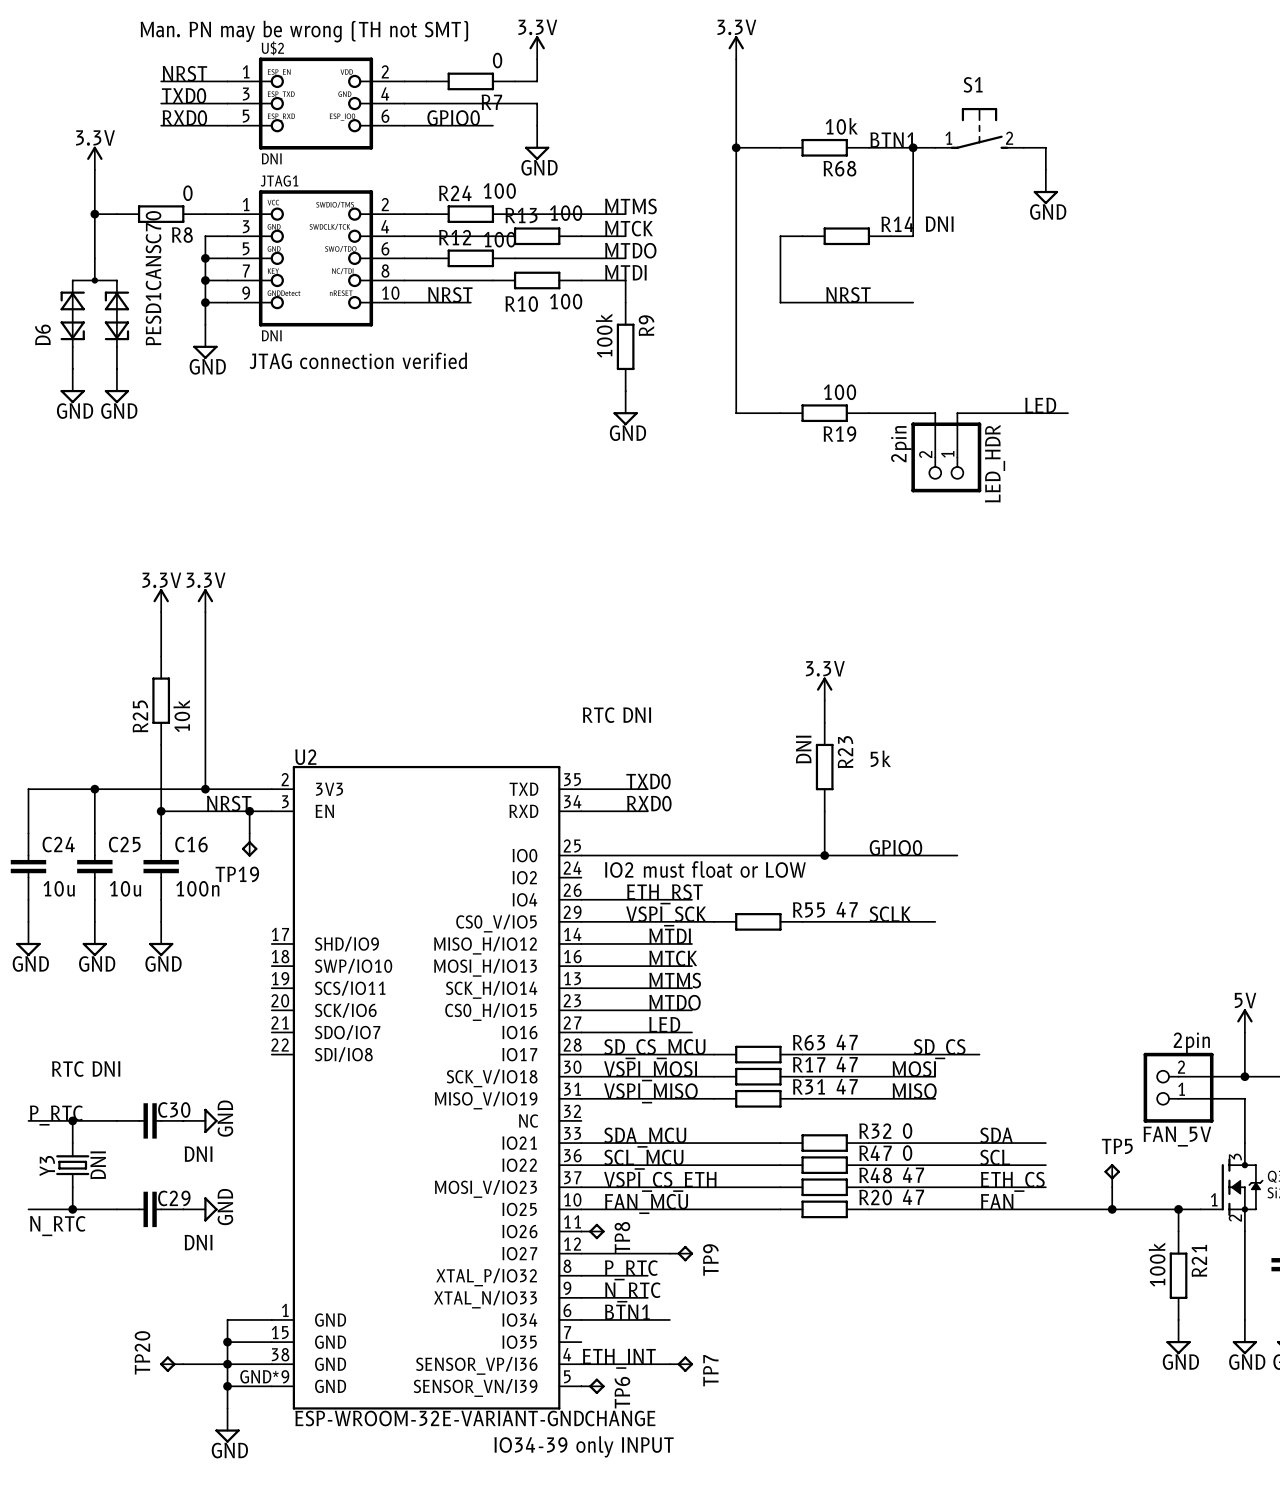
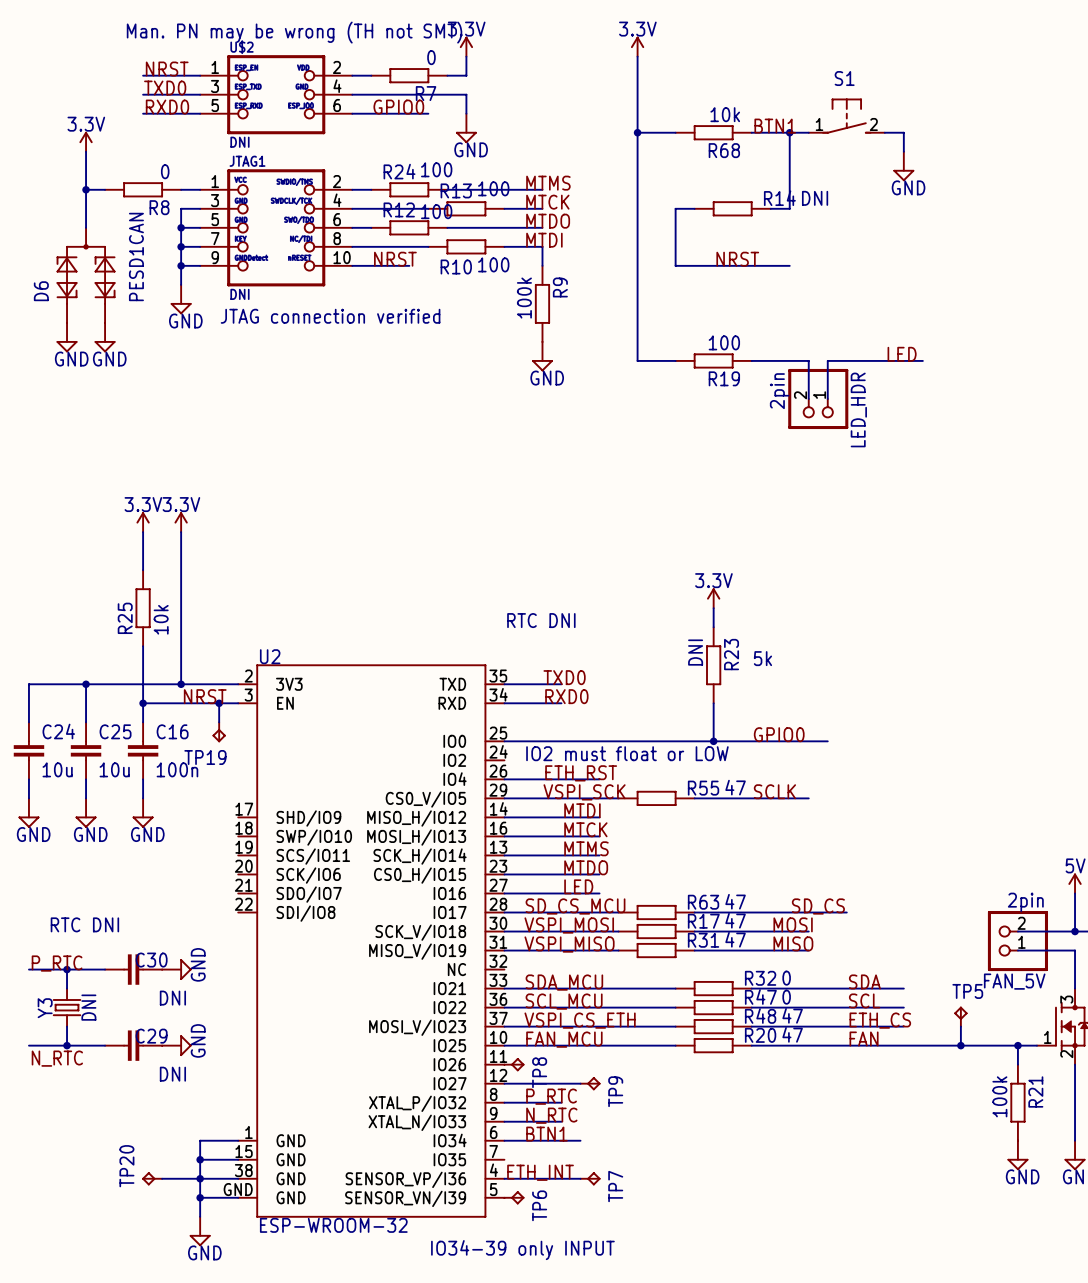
D6 value: PESD1CANSC70 (153, 278) -> PESD1CAN (136, 256)
U2 pin number: GND*9 (264, 1376) -> GND (238, 1189)
U2 value: ESP-WROOM-32E-VARIANT-GNDCHANGE (475, 1418) -> ESP-WROOM-32 (333, 1225)

